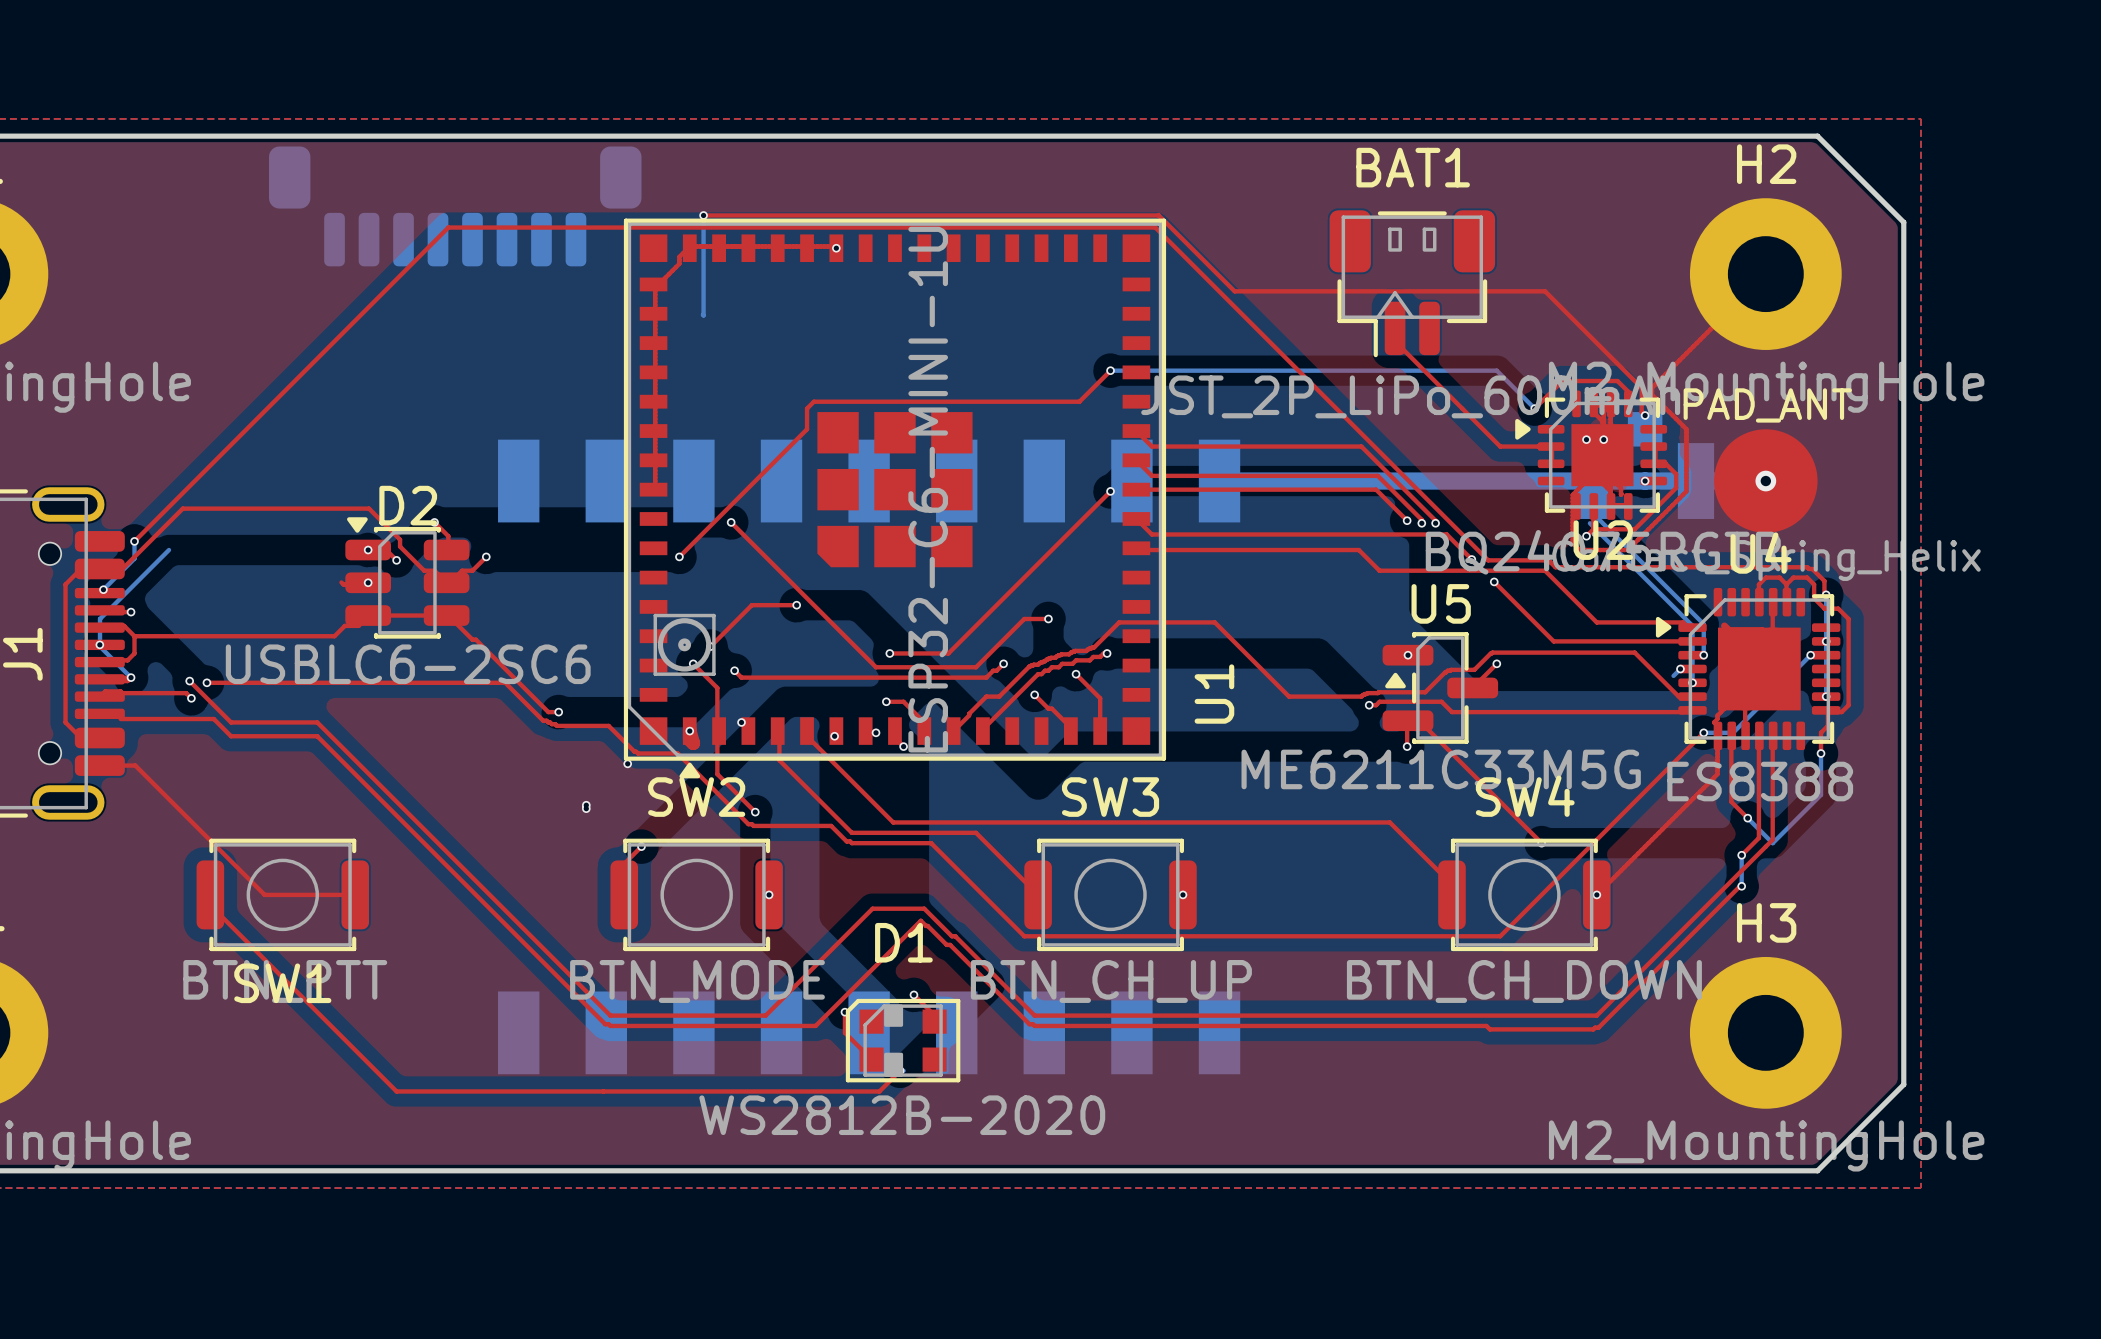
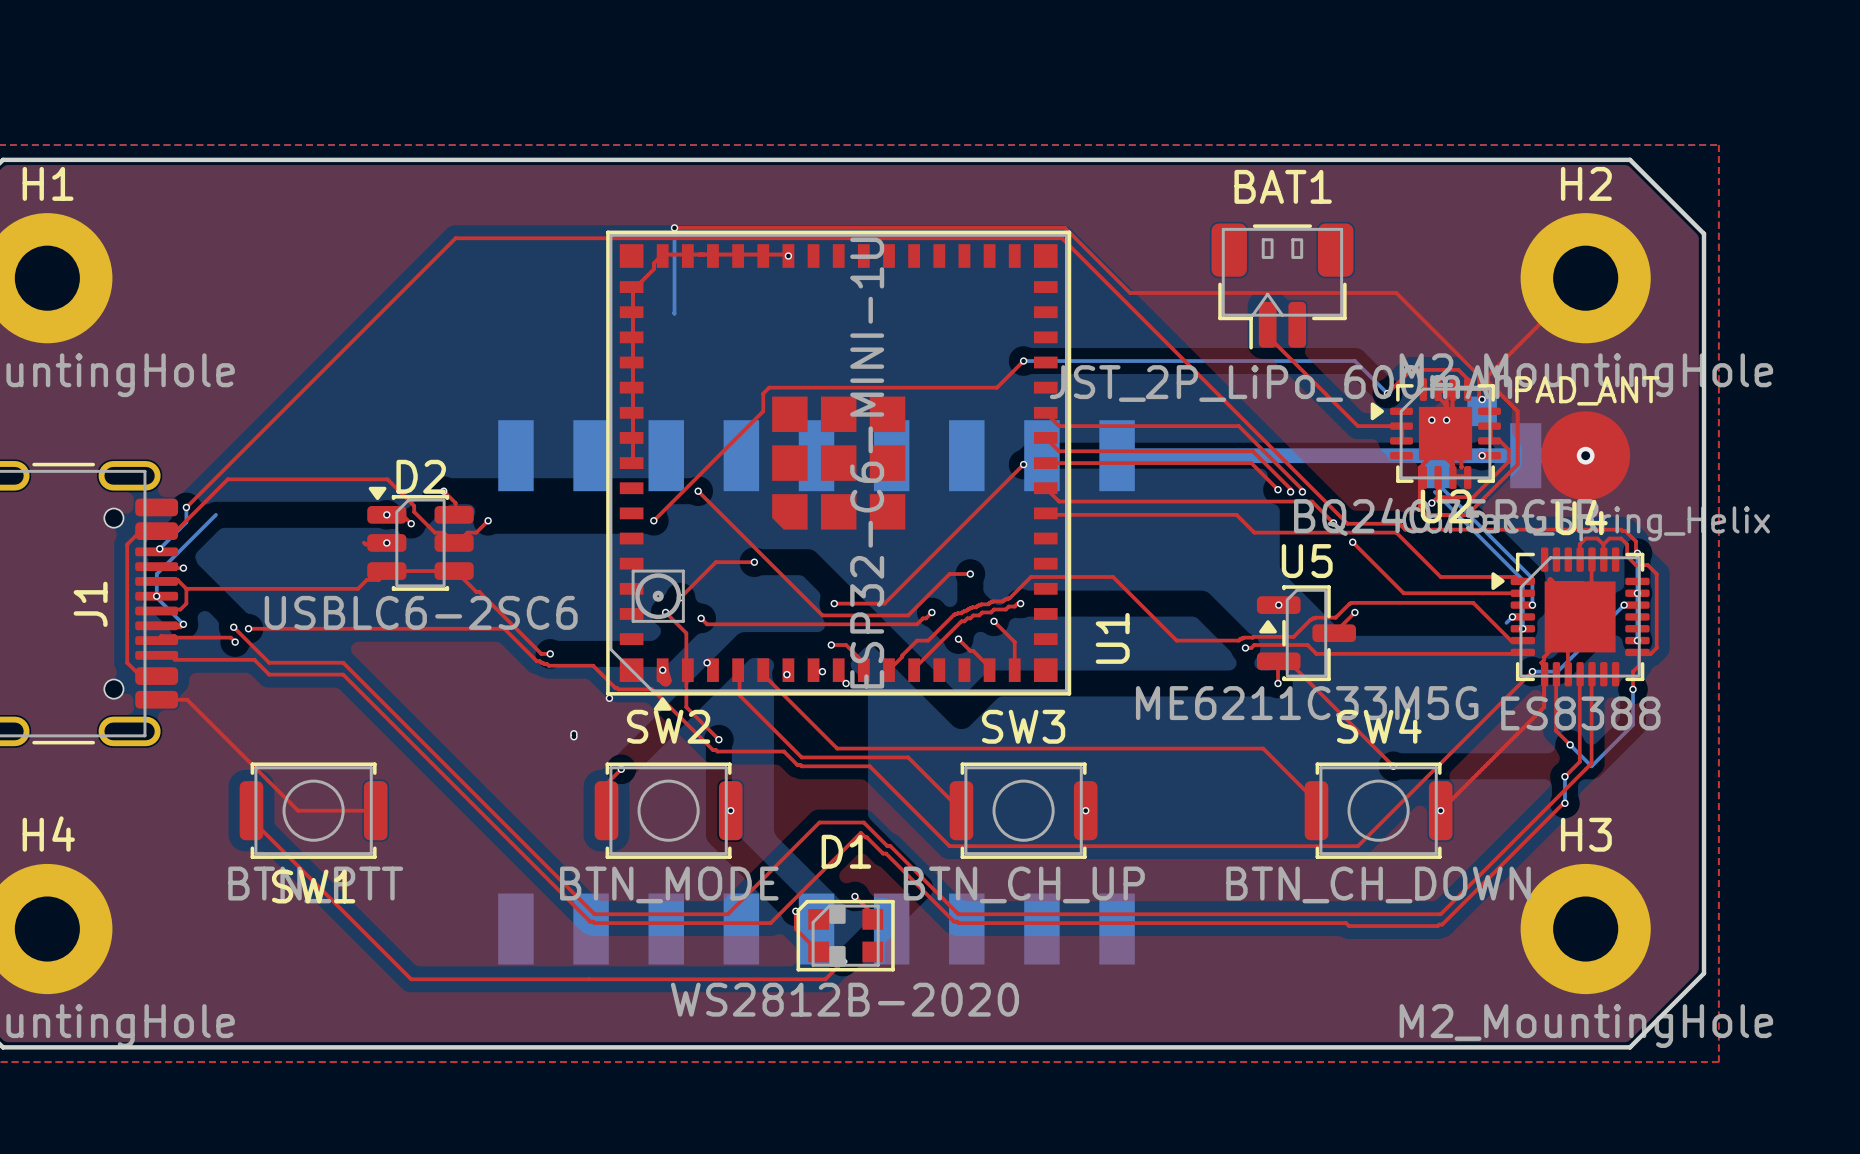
part: (455, 206) -> none

